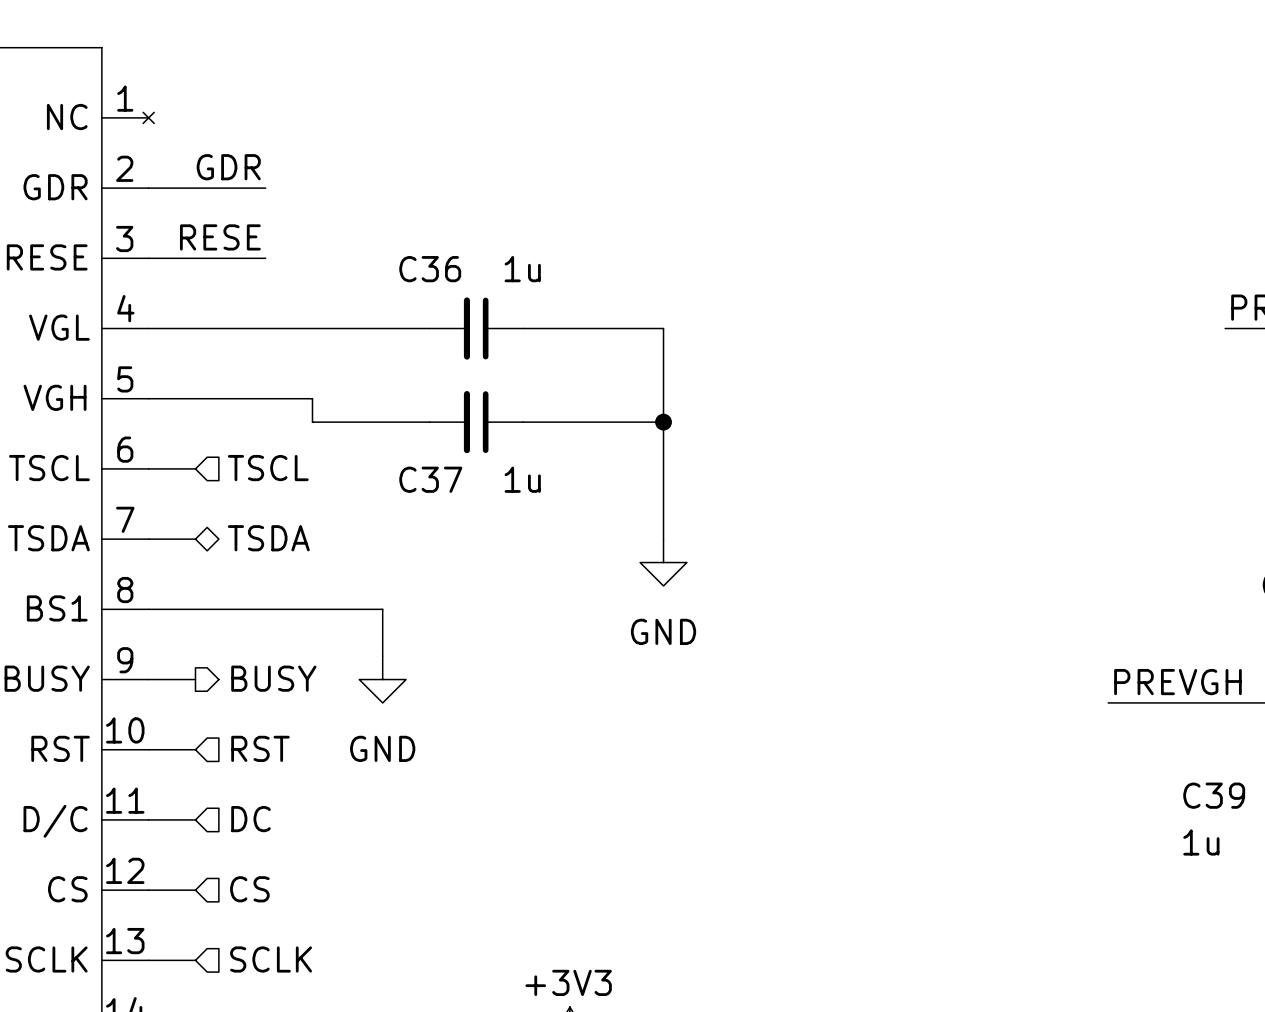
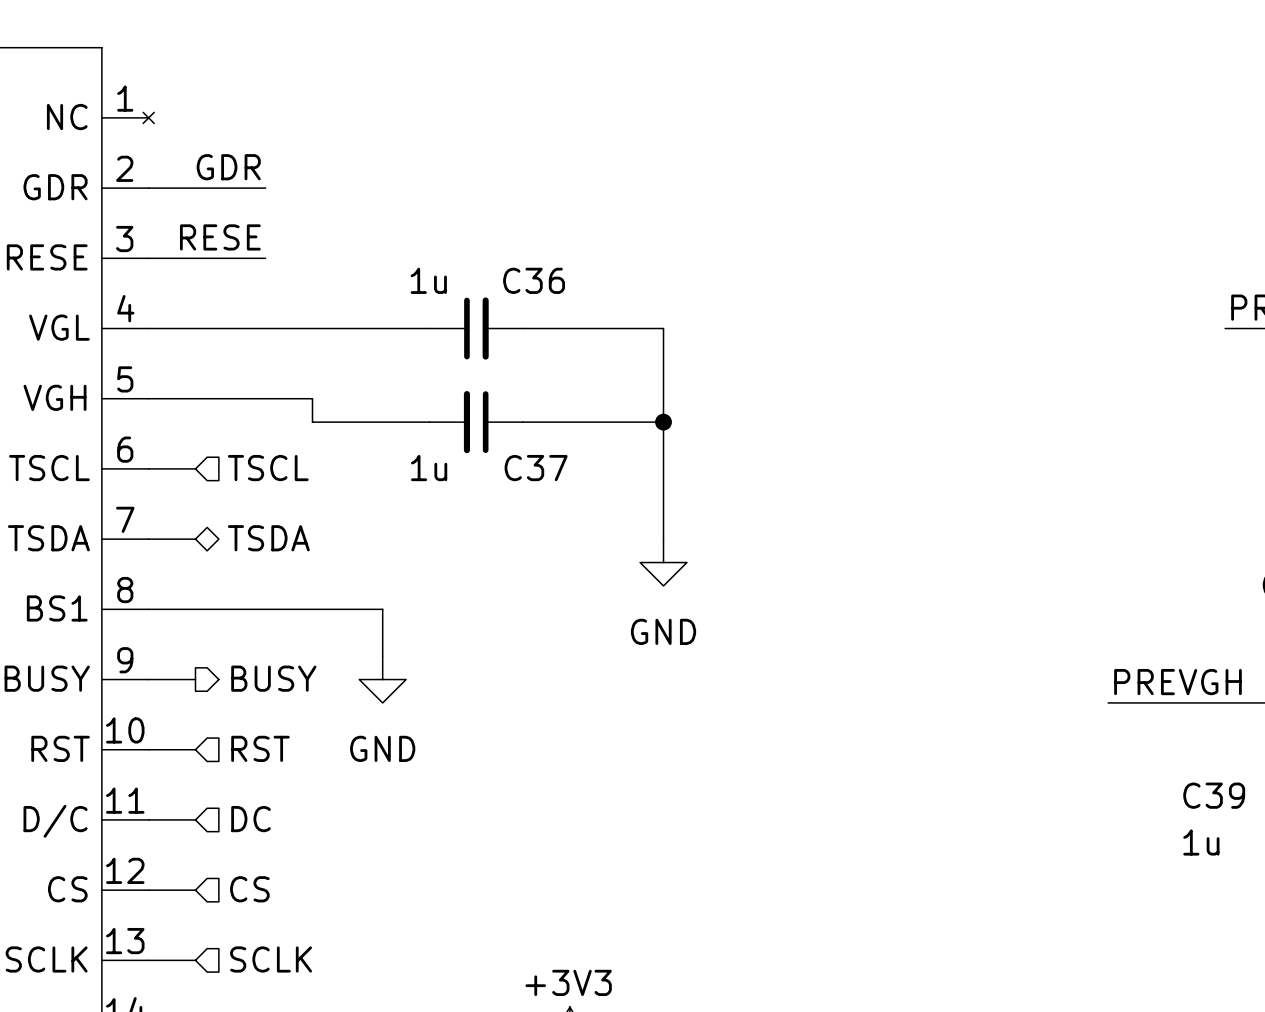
C36 name position: C36 (430, 269) -> C36 (534, 280)
C36 value position: 1u (522, 269) -> 1u (428, 280)
C36 rotation: 0° (476, 328) -> 180° (476, 328)
C37 name position: C37 (430, 479) -> C37 (536, 468)
C37 value position: 1u (522, 479) -> 1u (429, 468)

